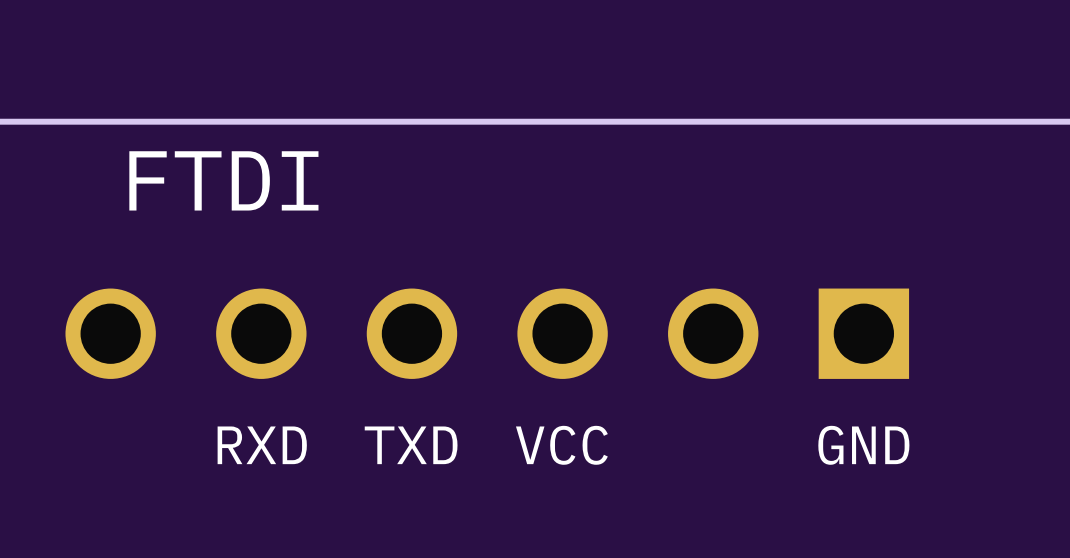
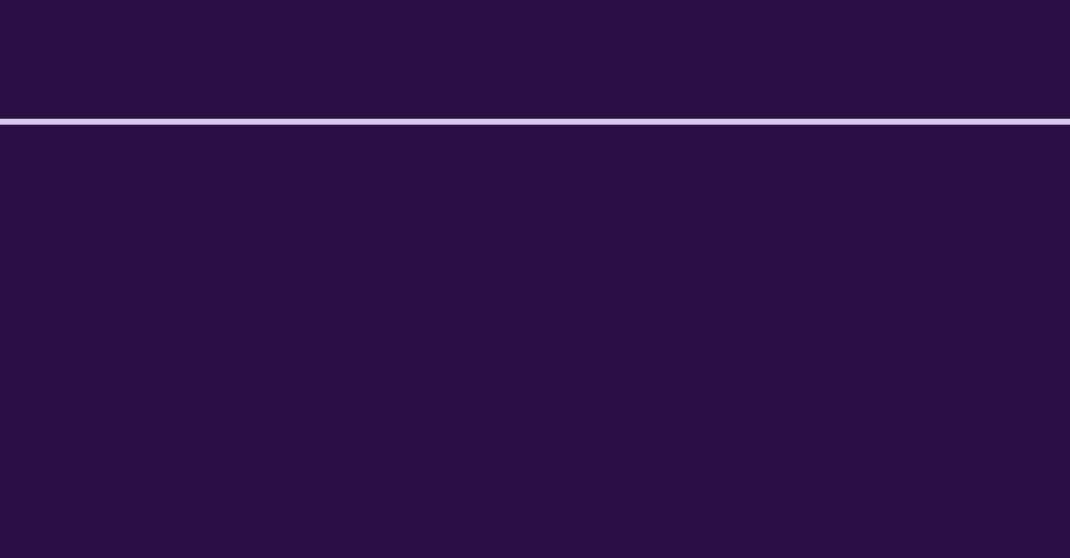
part: FTDI (487, 333) -> none

